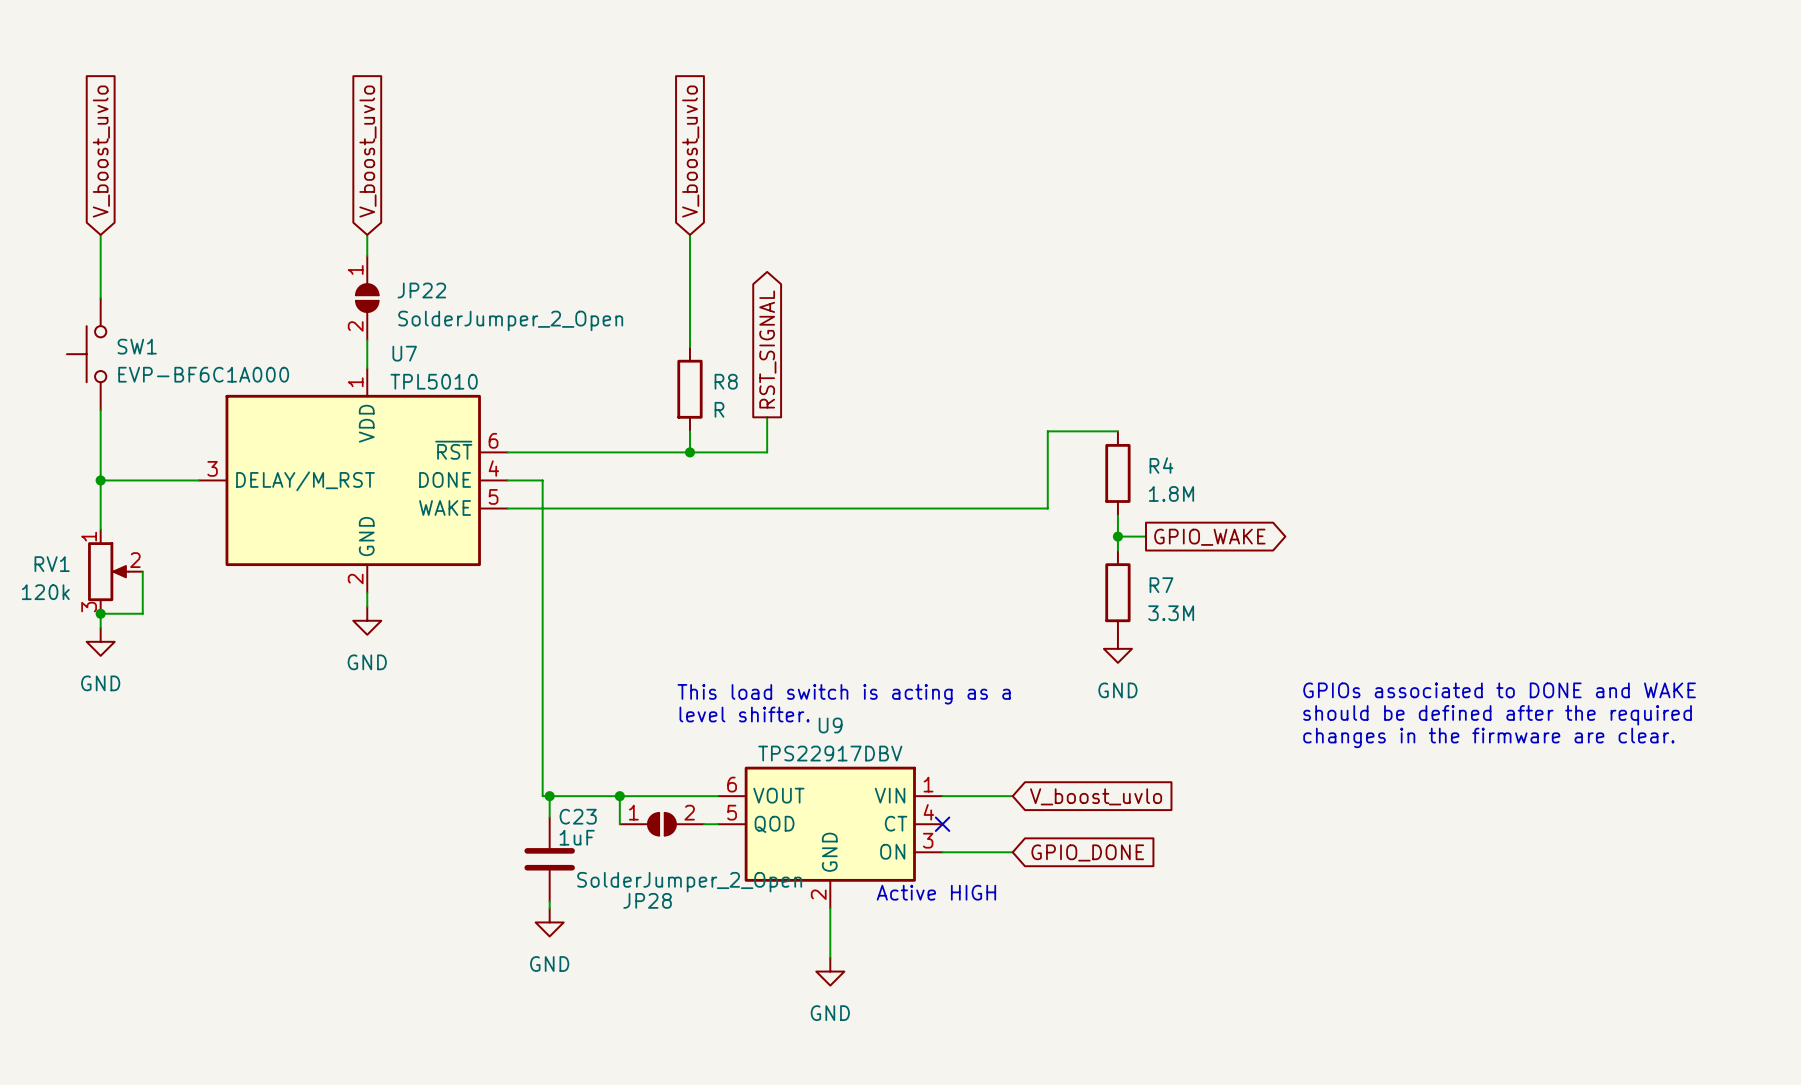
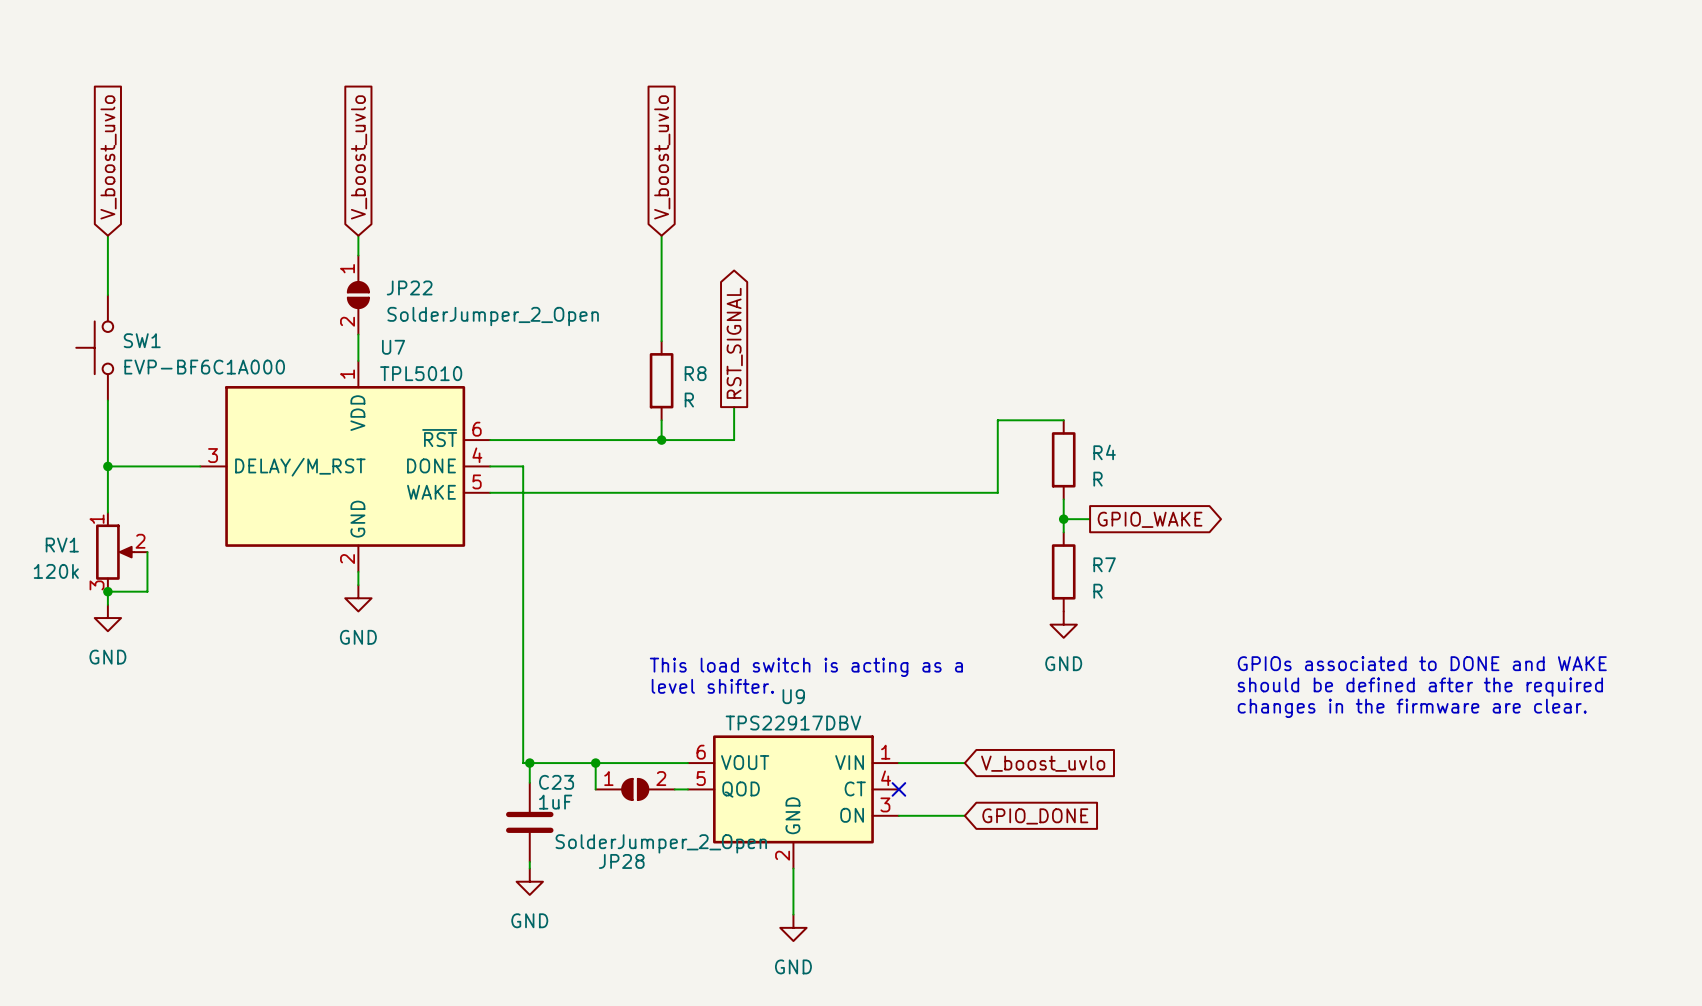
R4 value: 1.8M (1171, 493) -> R (1098, 479)
R7 value: 3.3M (1171, 613) -> R (1098, 591)
text: Active HIGH (936, 892) -> none

